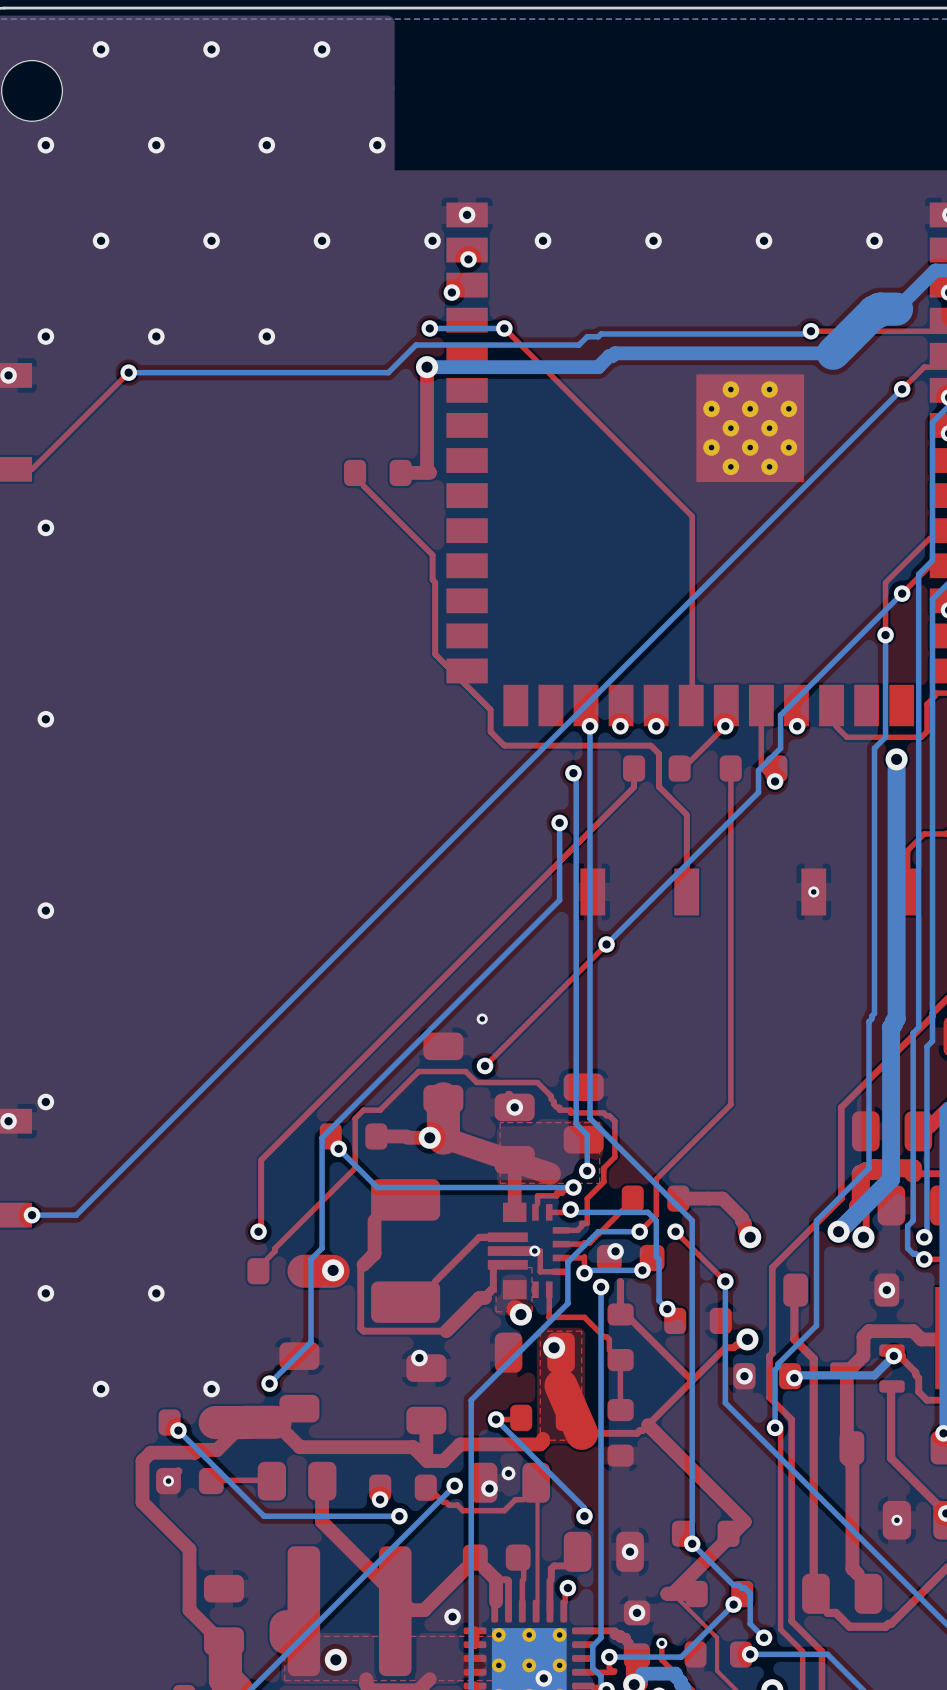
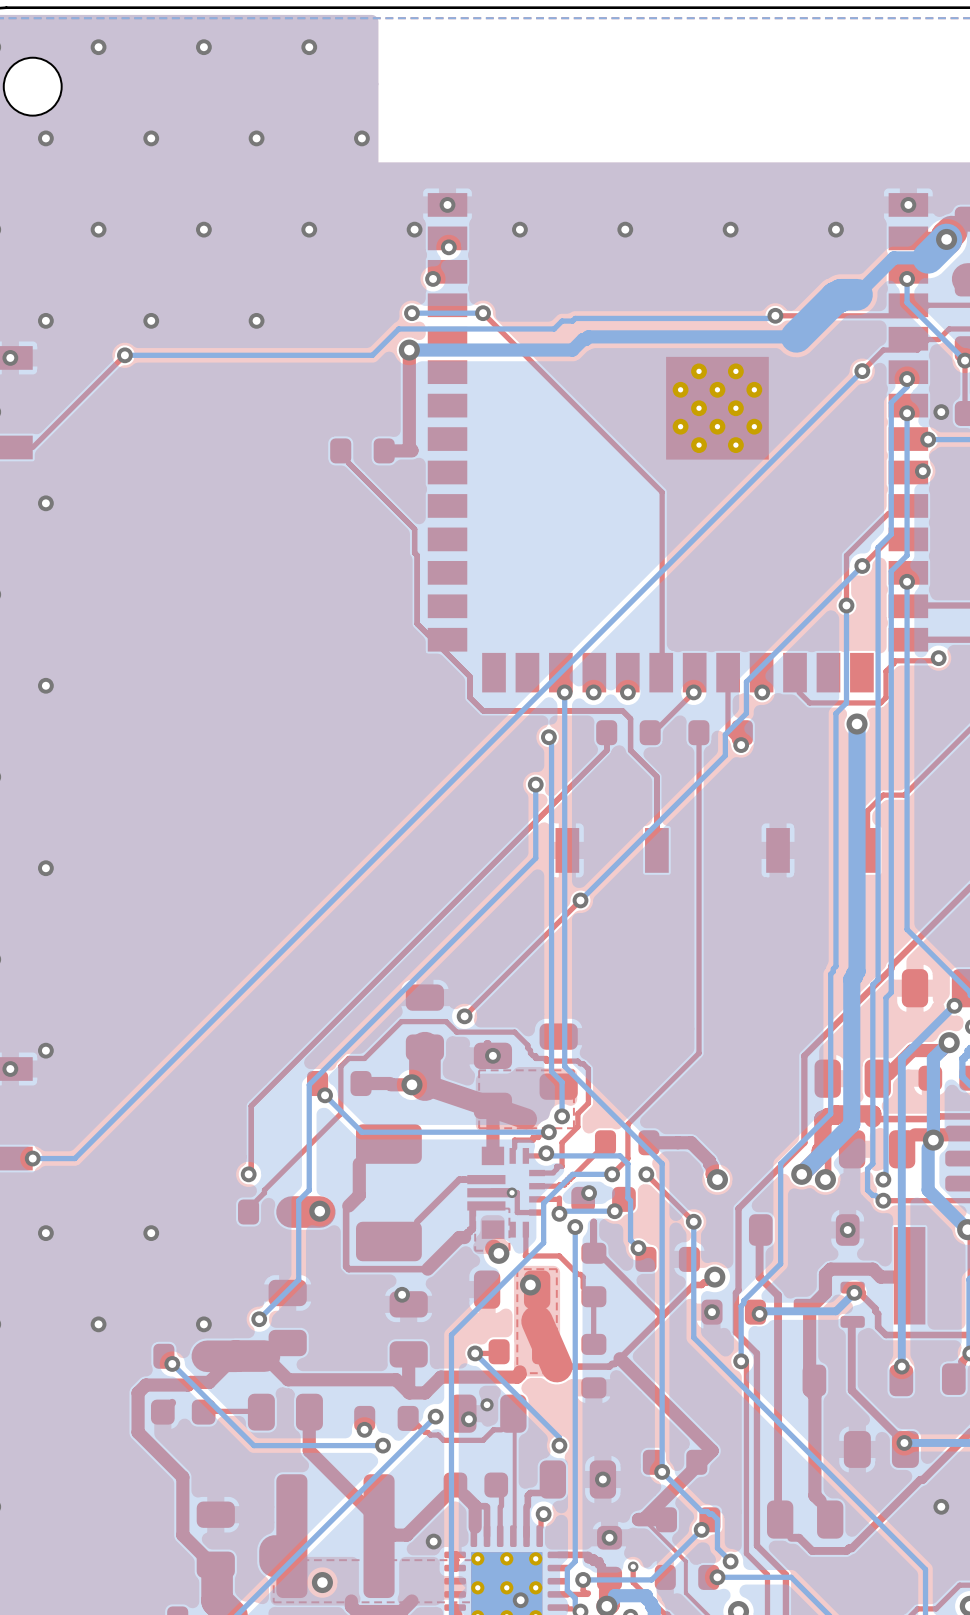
via: (813, 891) -> none
via: (482, 1019) -> none
via: (168, 1481) -> none
via: (896, 1520) -> none

